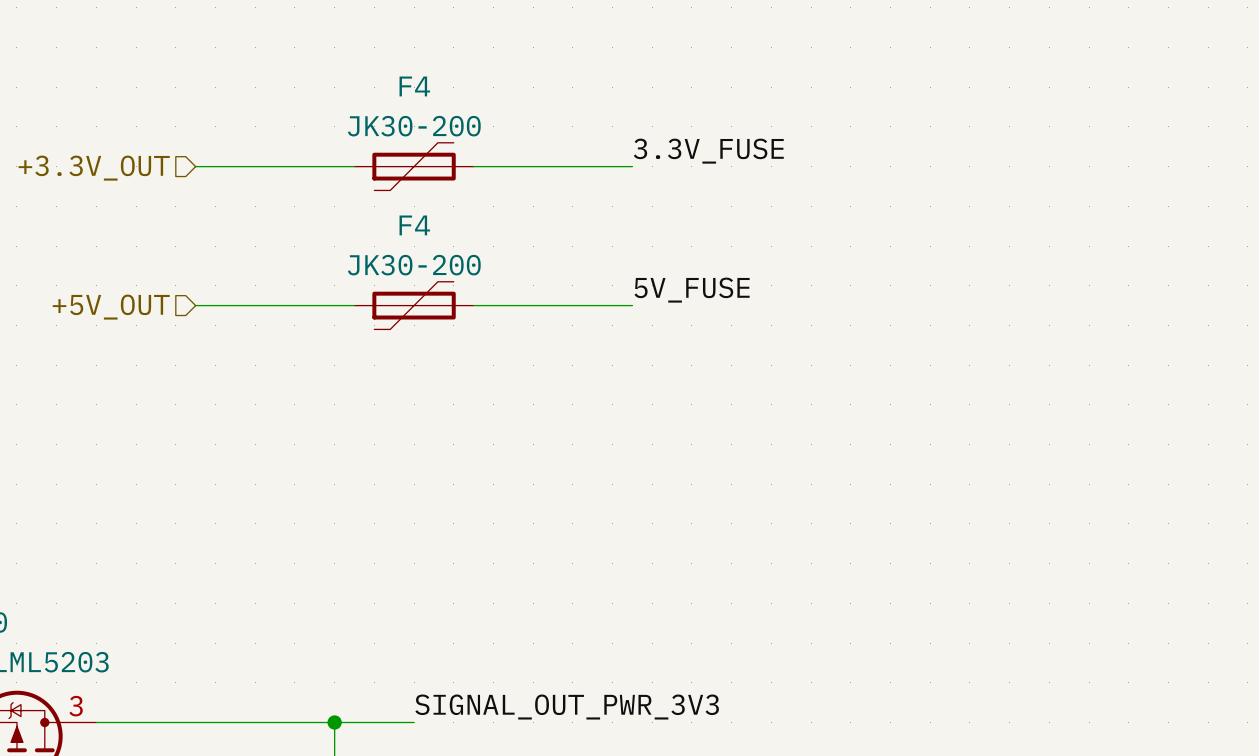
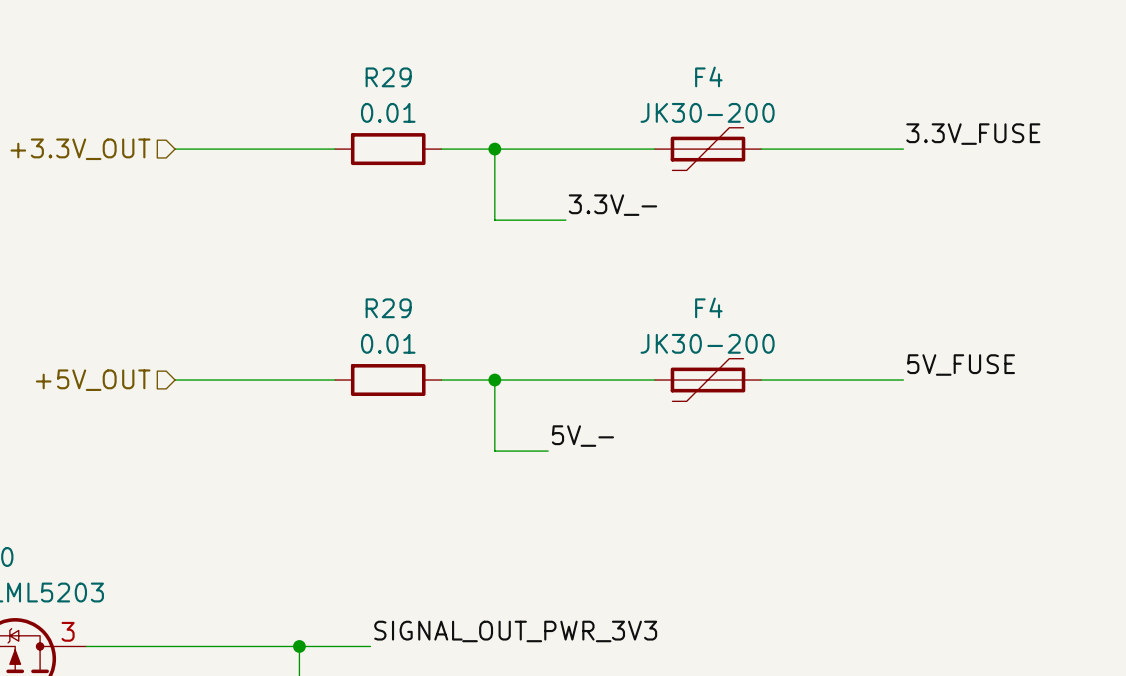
label position: 3.3V_FUSE (708, 151) -> 3.3V_FUSE (973, 134)
F4: JK30-200 (414, 166) -> none
R29: none -> 0.01 (388, 149)
wire: none -> (494, 149) (494, 220) (565, 220)
junction: none -> (494, 149)
wire: none -> (565, 149) (654, 149)
F4: none -> JK30-200 (707, 149)
wire: none -> (761, 149) (903, 149)
label: none -> 3.3V_- (612, 205)
label: 5V_FUSE (692, 290) -> none
wire: (195, 305) (354, 305) -> none
F4: JK30-200 (414, 305) -> none
wire: (473, 305) (632, 305) -> none
hierarchical label position: +5V_OUT (111, 307) -> +5V_OUT (93, 380)
label: none -> 5V_FUSE (961, 365)
wire: none -> (175, 380) (334, 380)
R29: none -> 0.01 (388, 380)
wire: none -> (441, 380) (654, 380)
wire: none -> (494, 380) (494, 451) (548, 451)
junction: none -> (494, 380)
F4: none -> JK30-200 (707, 380)
wire: none -> (761, 380) (903, 380)
label: none -> 5V_- (582, 436)

